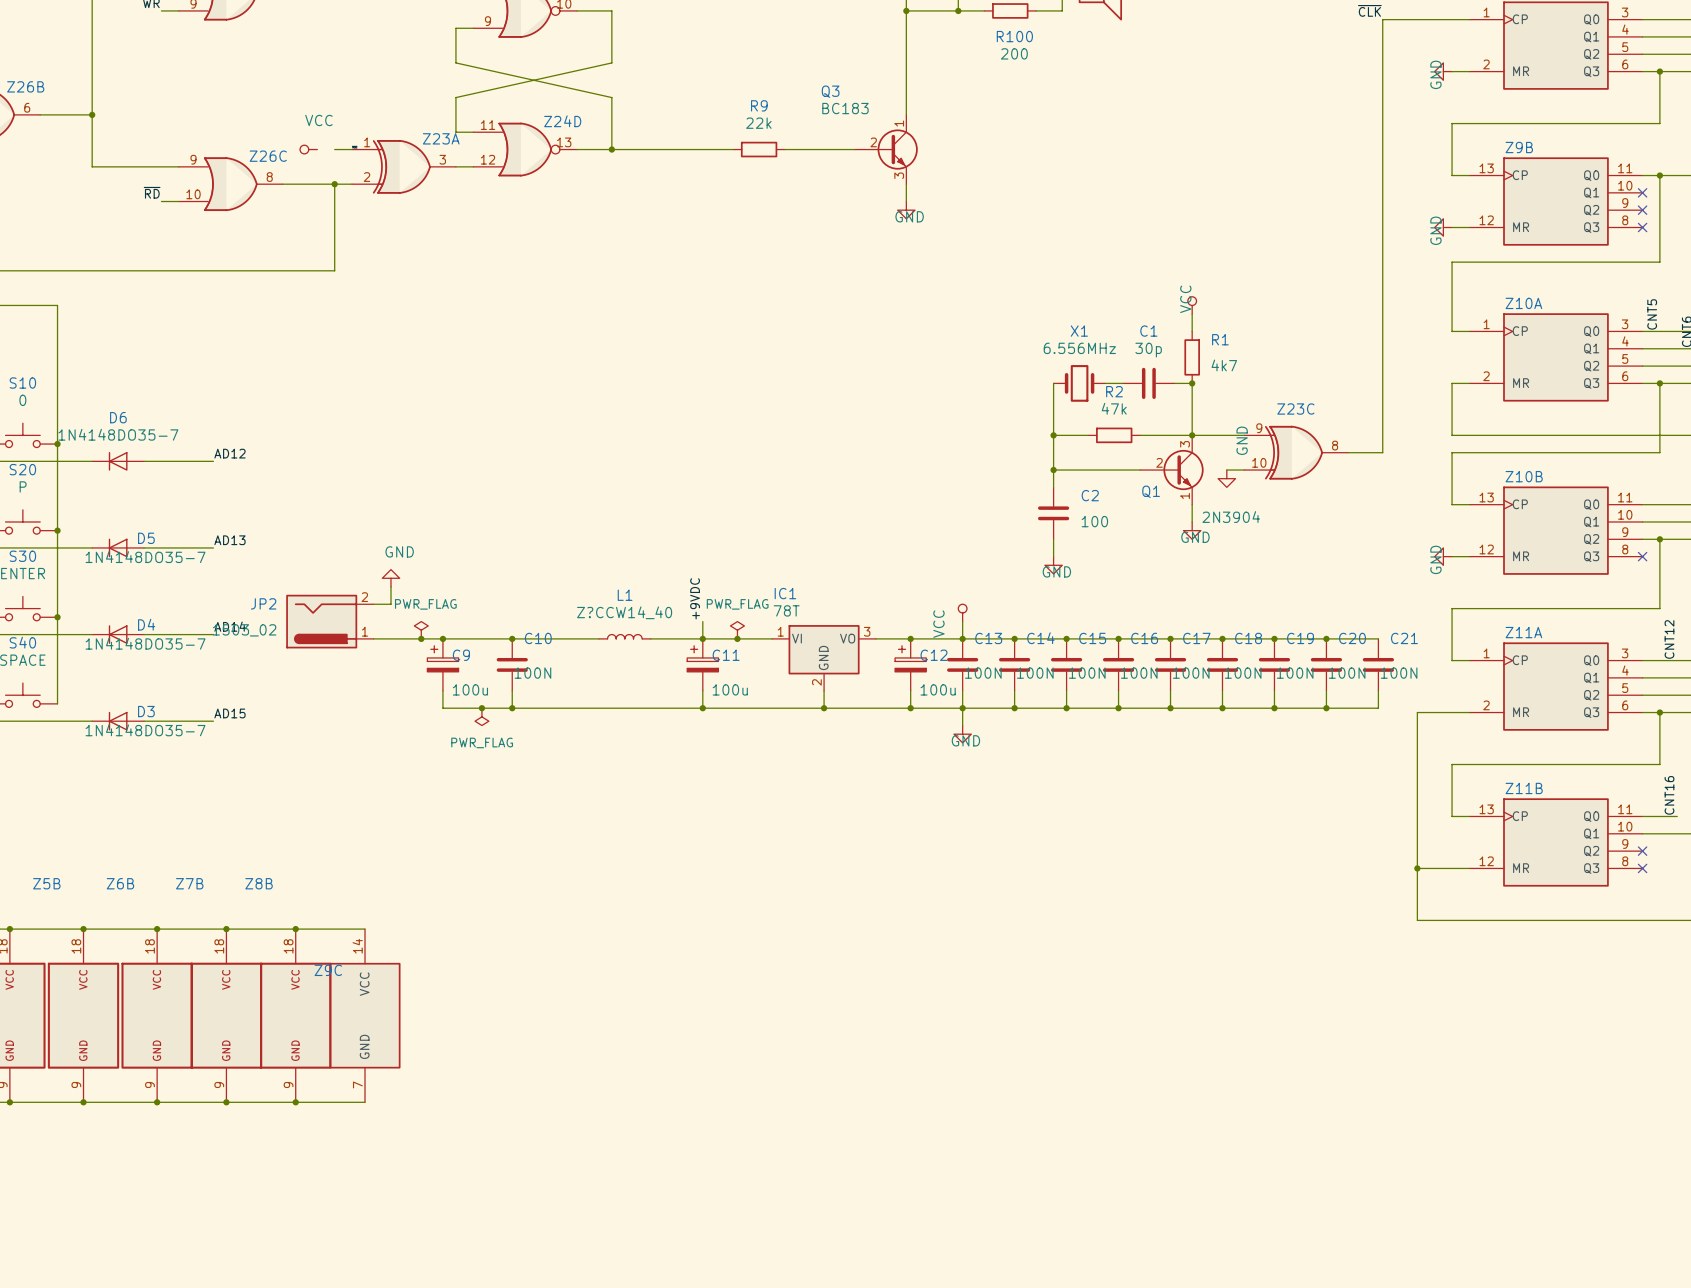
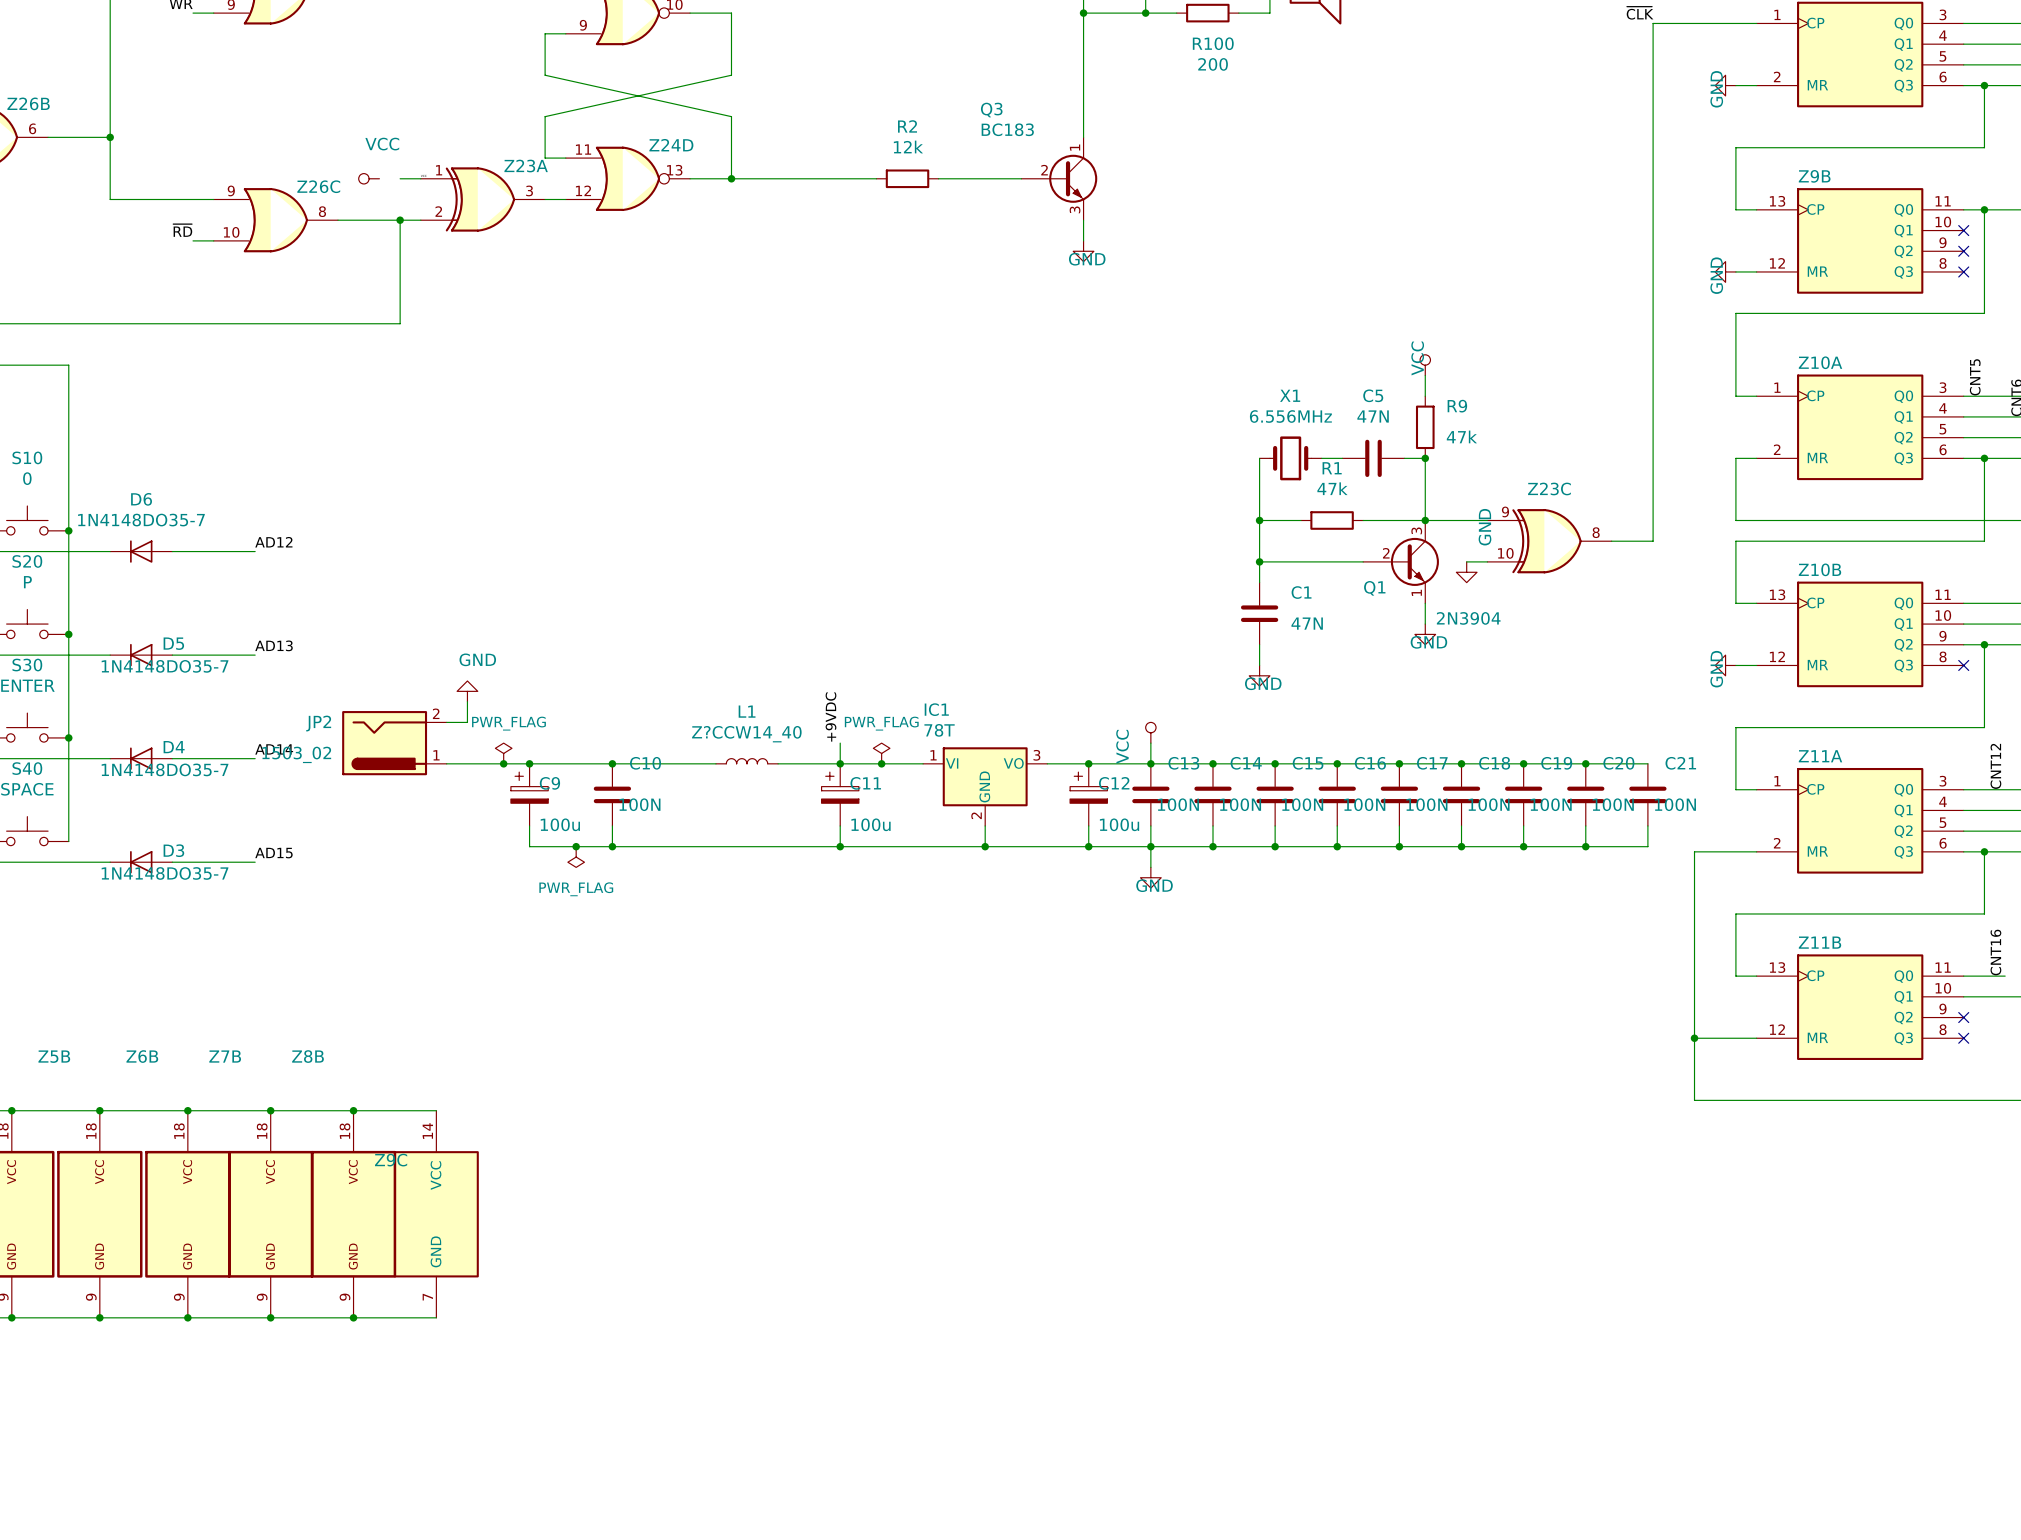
R9 name: R9 (759, 105) -> R2 (907, 126)
R9 value: 22k (758, 123) -> 12k (908, 147)
C1 name: C1 (1148, 331) -> C5 (1373, 395)
R1 name: R1 (1220, 339) -> R9 (1457, 406)
C1 value: 30p (1148, 350) -> 47N (1373, 416)
R1 value: 4k7 (1224, 365) -> 47k (1461, 436)
R2 name: R2 (1114, 391) -> R1 (1332, 468)
C2 name: C2 (1090, 495) -> C1 (1301, 592)
C2 value: 100 (1094, 521) -> 47N (1307, 623)

